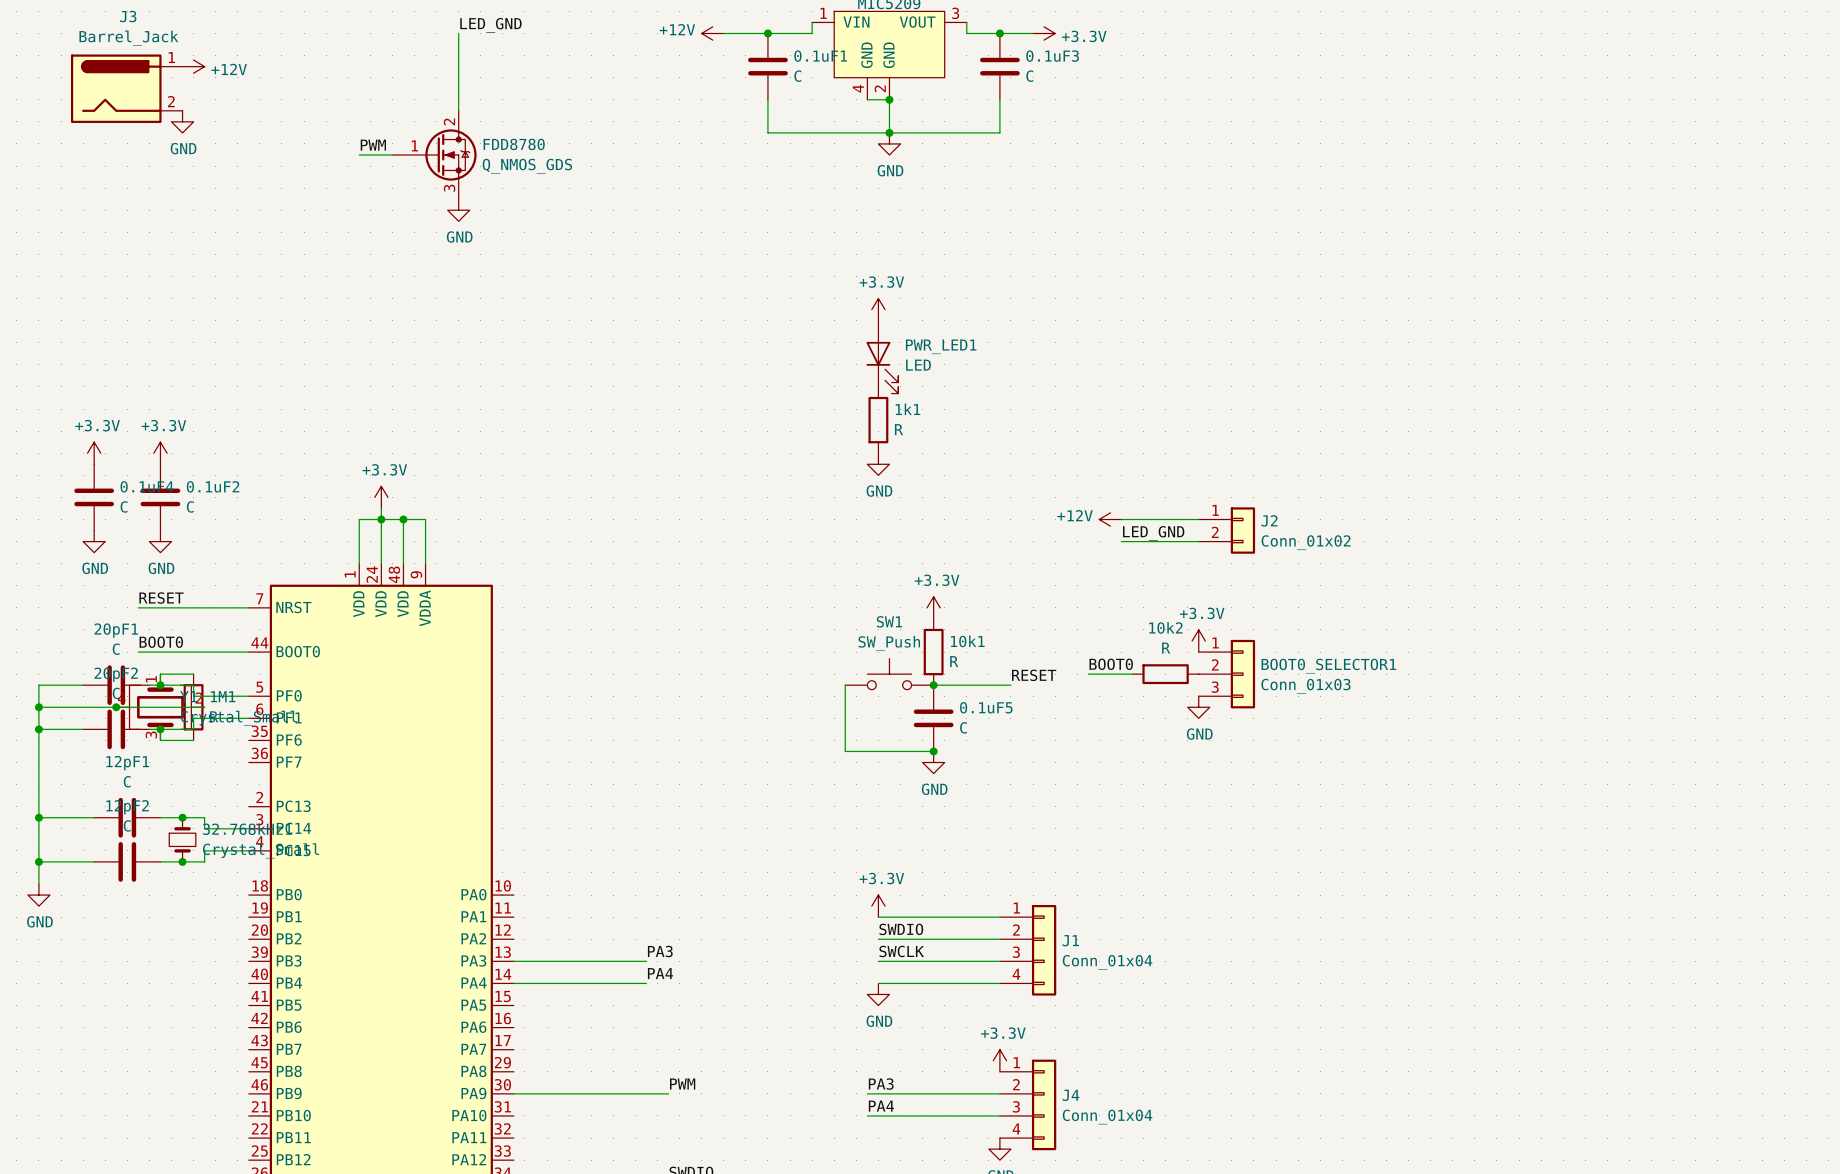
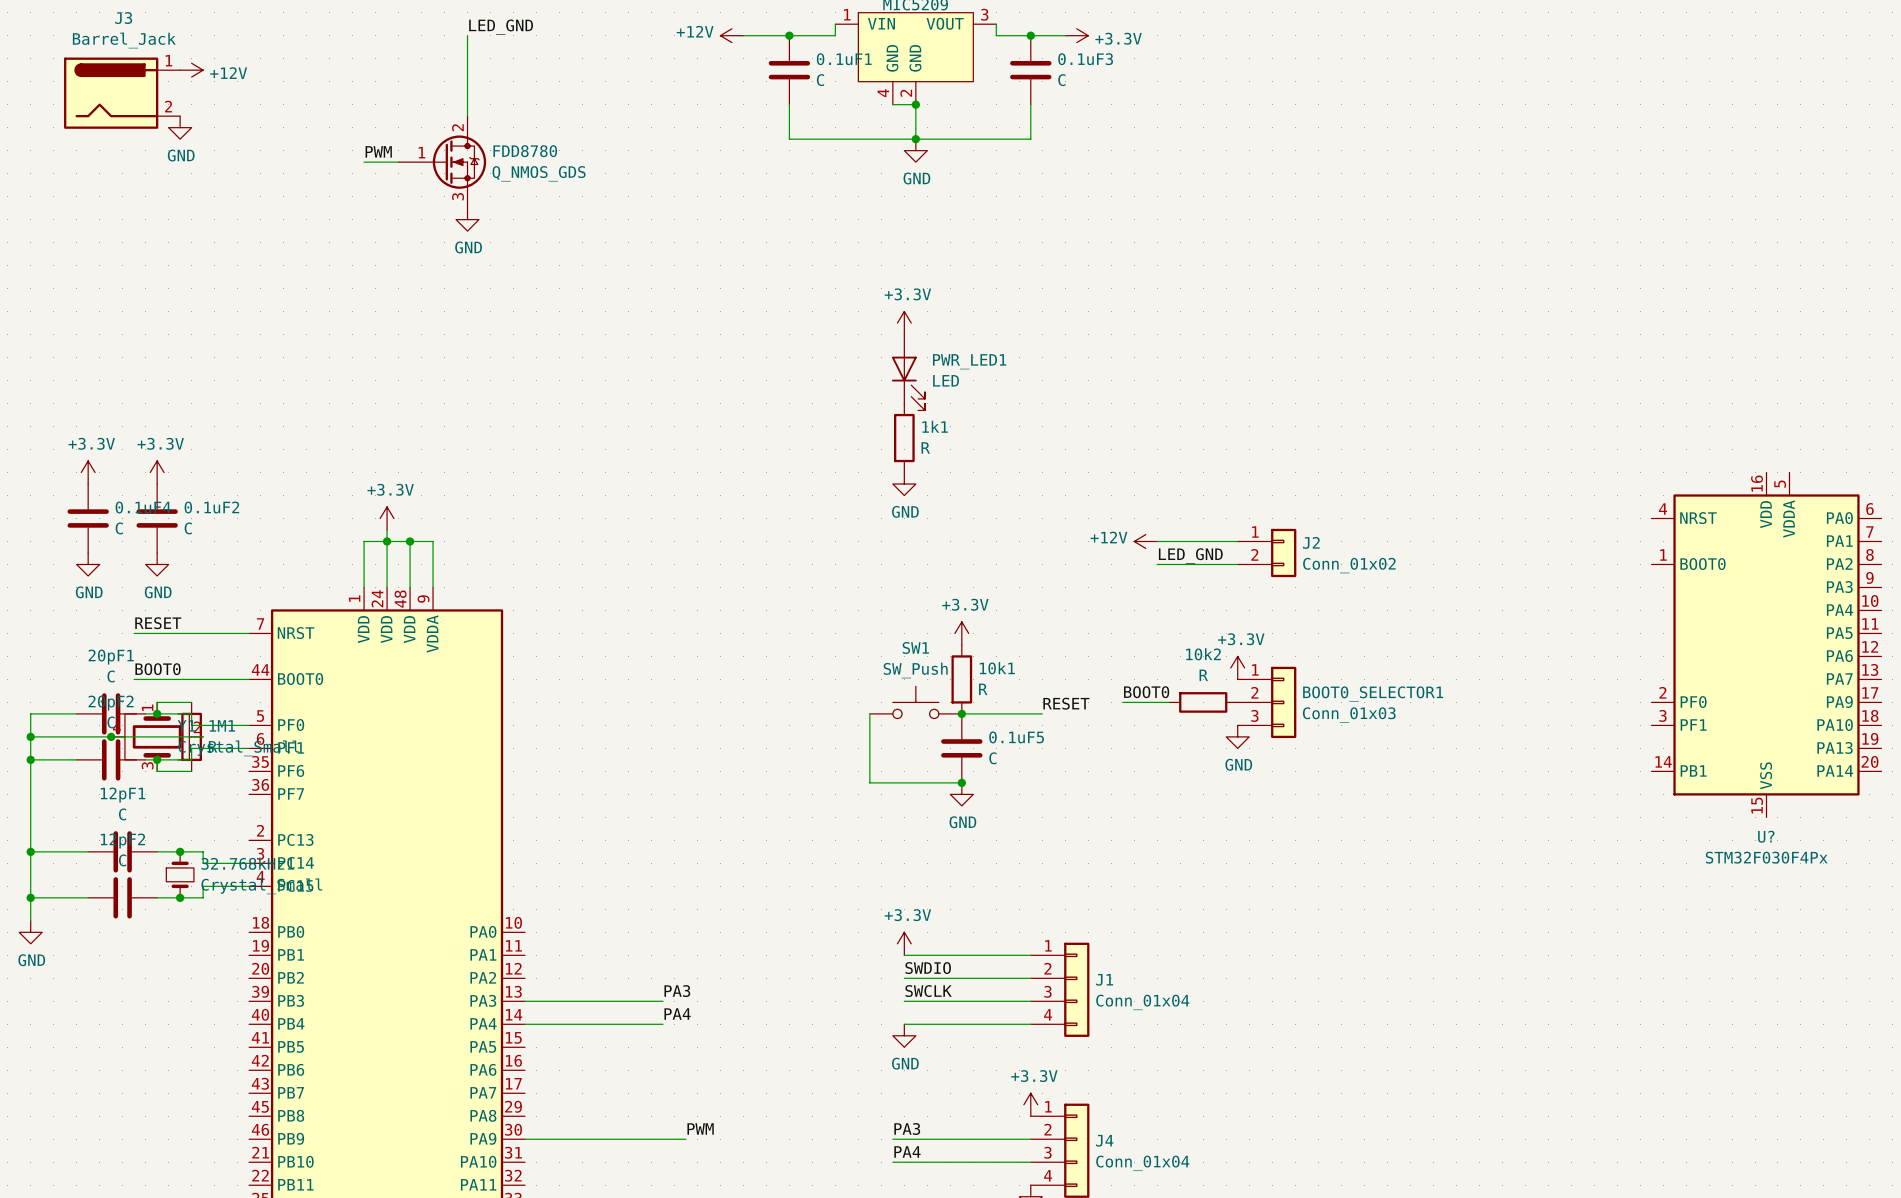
U?: none -> STM32F030F4Px (1766, 644)

